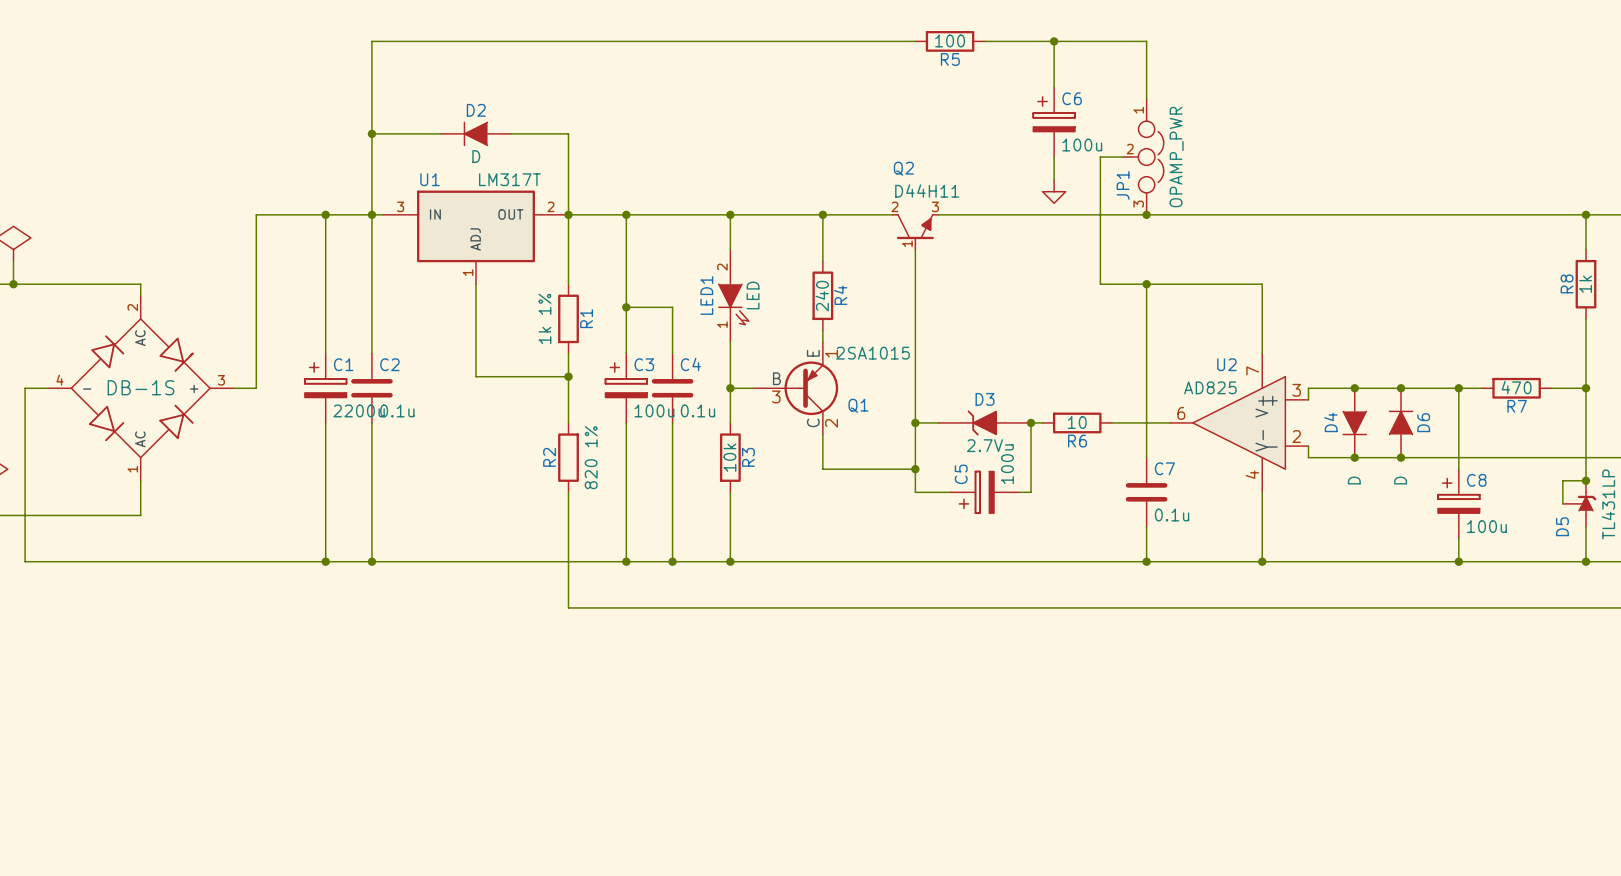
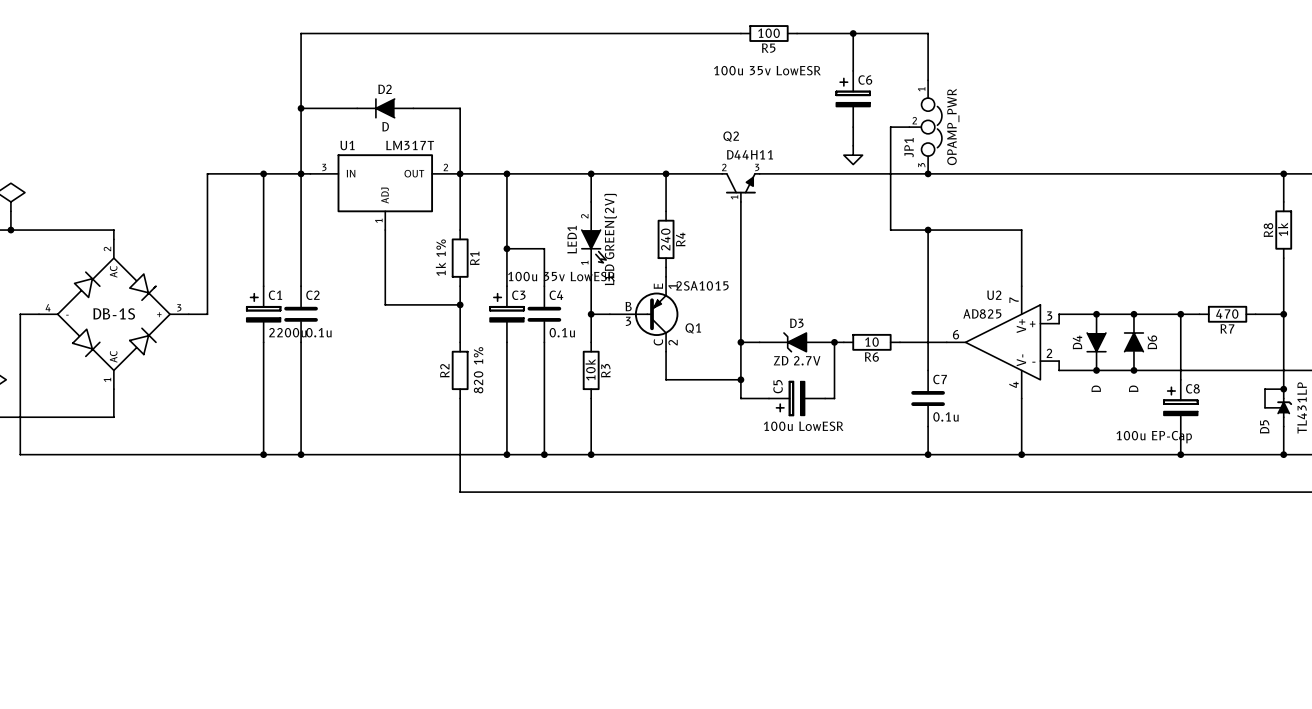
C6 value: 100u (1082, 145) -> 100u 35v LowESR (767, 70)
LED1 value: LED (753, 295) -> LED GREEN(2V) (610, 239)
C3 value: 100u (654, 410) -> 100u 35v LowESR (561, 276)
D3 value: 2.7V (985, 445) -> ZD 2.7V (797, 360)
C5 value: 100u (1007, 464) -> 100u LowESR (803, 426)
C8 value: 100u (1486, 526) -> 100u EP-Cap (1154, 437)

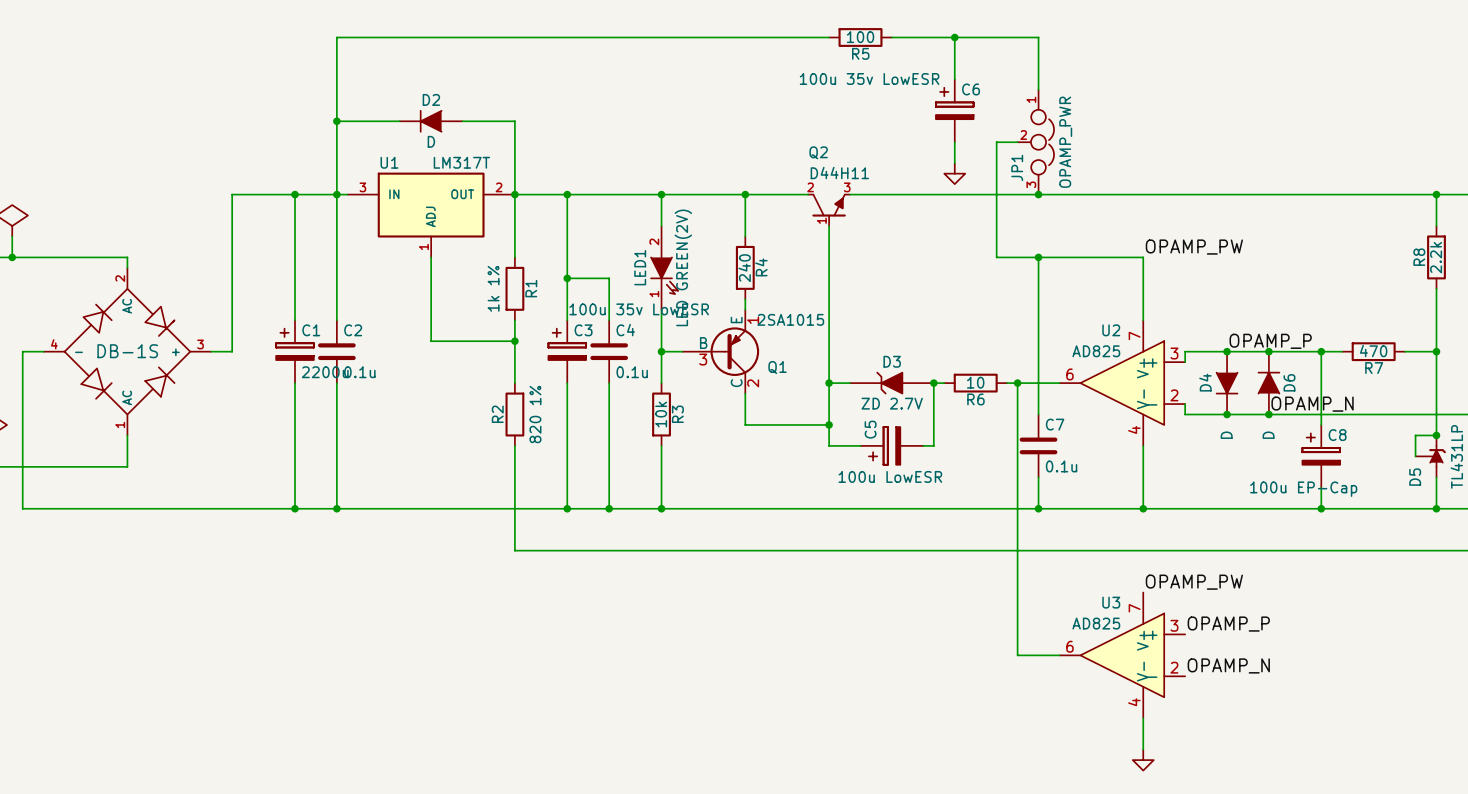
label: none -> OPAMP_PW (1194, 247)
R8 value: 1k (1283, 229) -> 2.2k (1436, 257)
label: none -> OPAMP_P (1270, 341)
wire: none -> (1017, 383) (1017, 655) (1059, 655)
junction: none -> (1017, 383)
label: none -> OPAMP_N (1312, 404)
label: none -> OPAMP_PW (1194, 582)
label: none -> OPAMP_P (1228, 624)
U3: none -> AD825 (1122, 655)
label: none -> OPAMP_N (1228, 665)
wire: none -> (1143, 718) (1143, 749)
power symbol: none -> (1143, 760)

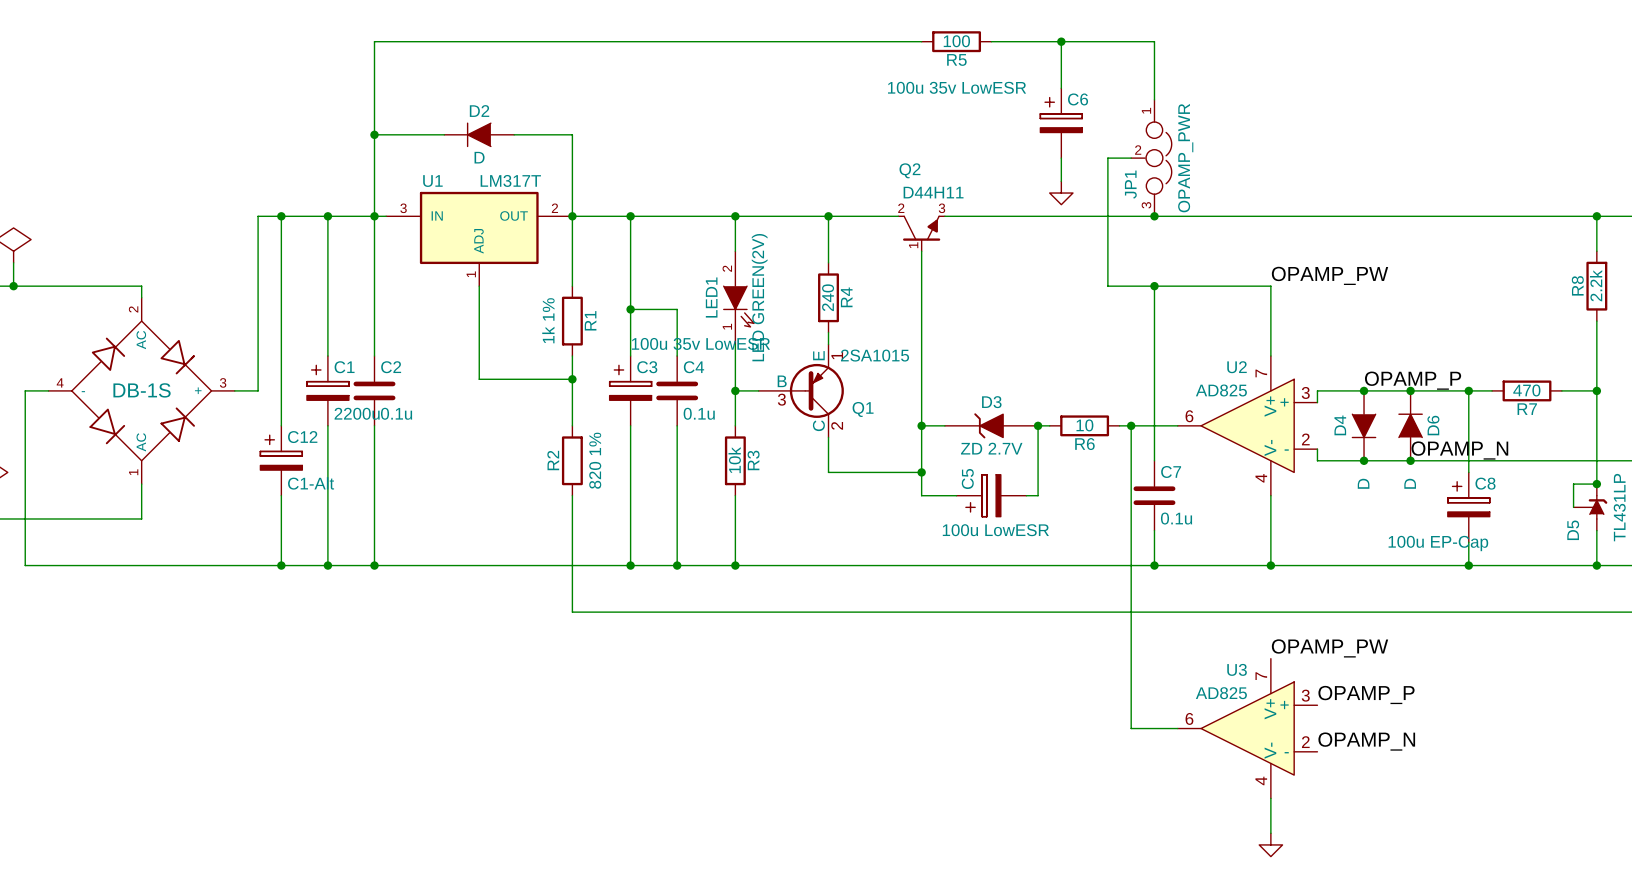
wire: none -> (281, 216) (281, 425)
junction: none -> (281, 216)
C12: none -> C1-Alt (281, 460)
wire: none -> (281, 495) (281, 565)
junction: none -> (281, 565)

